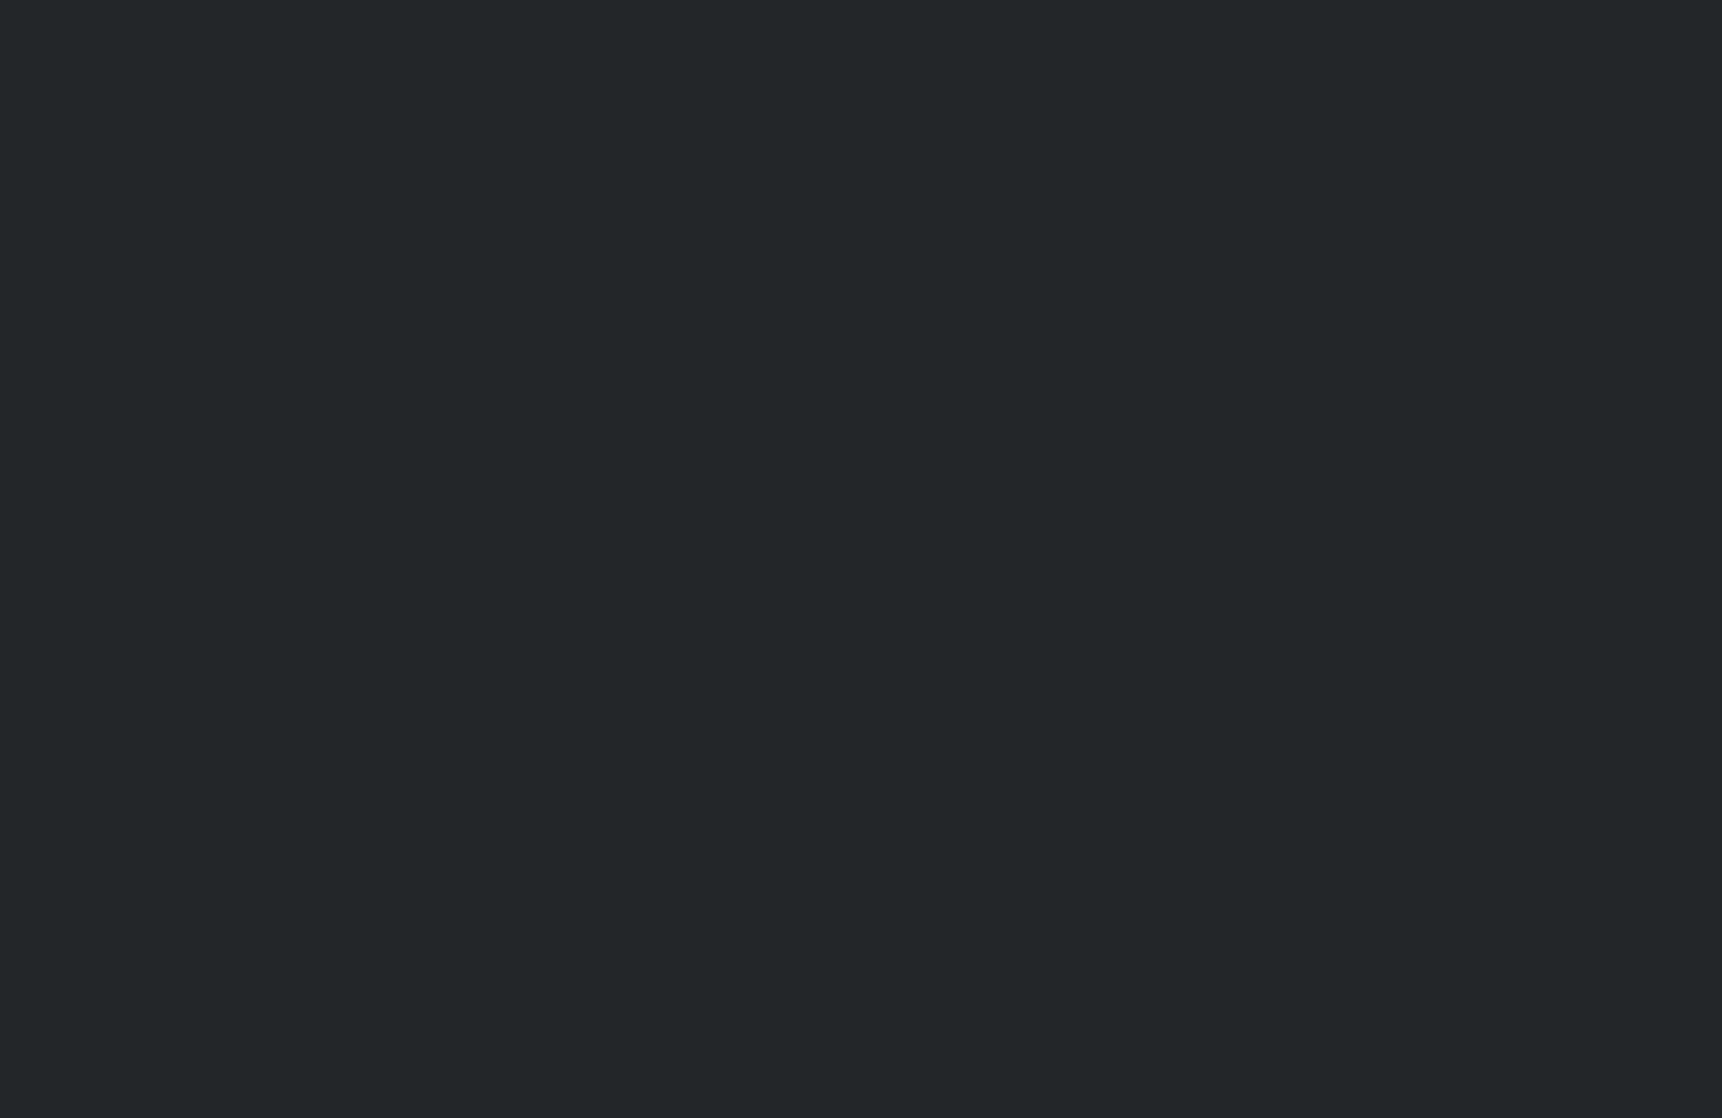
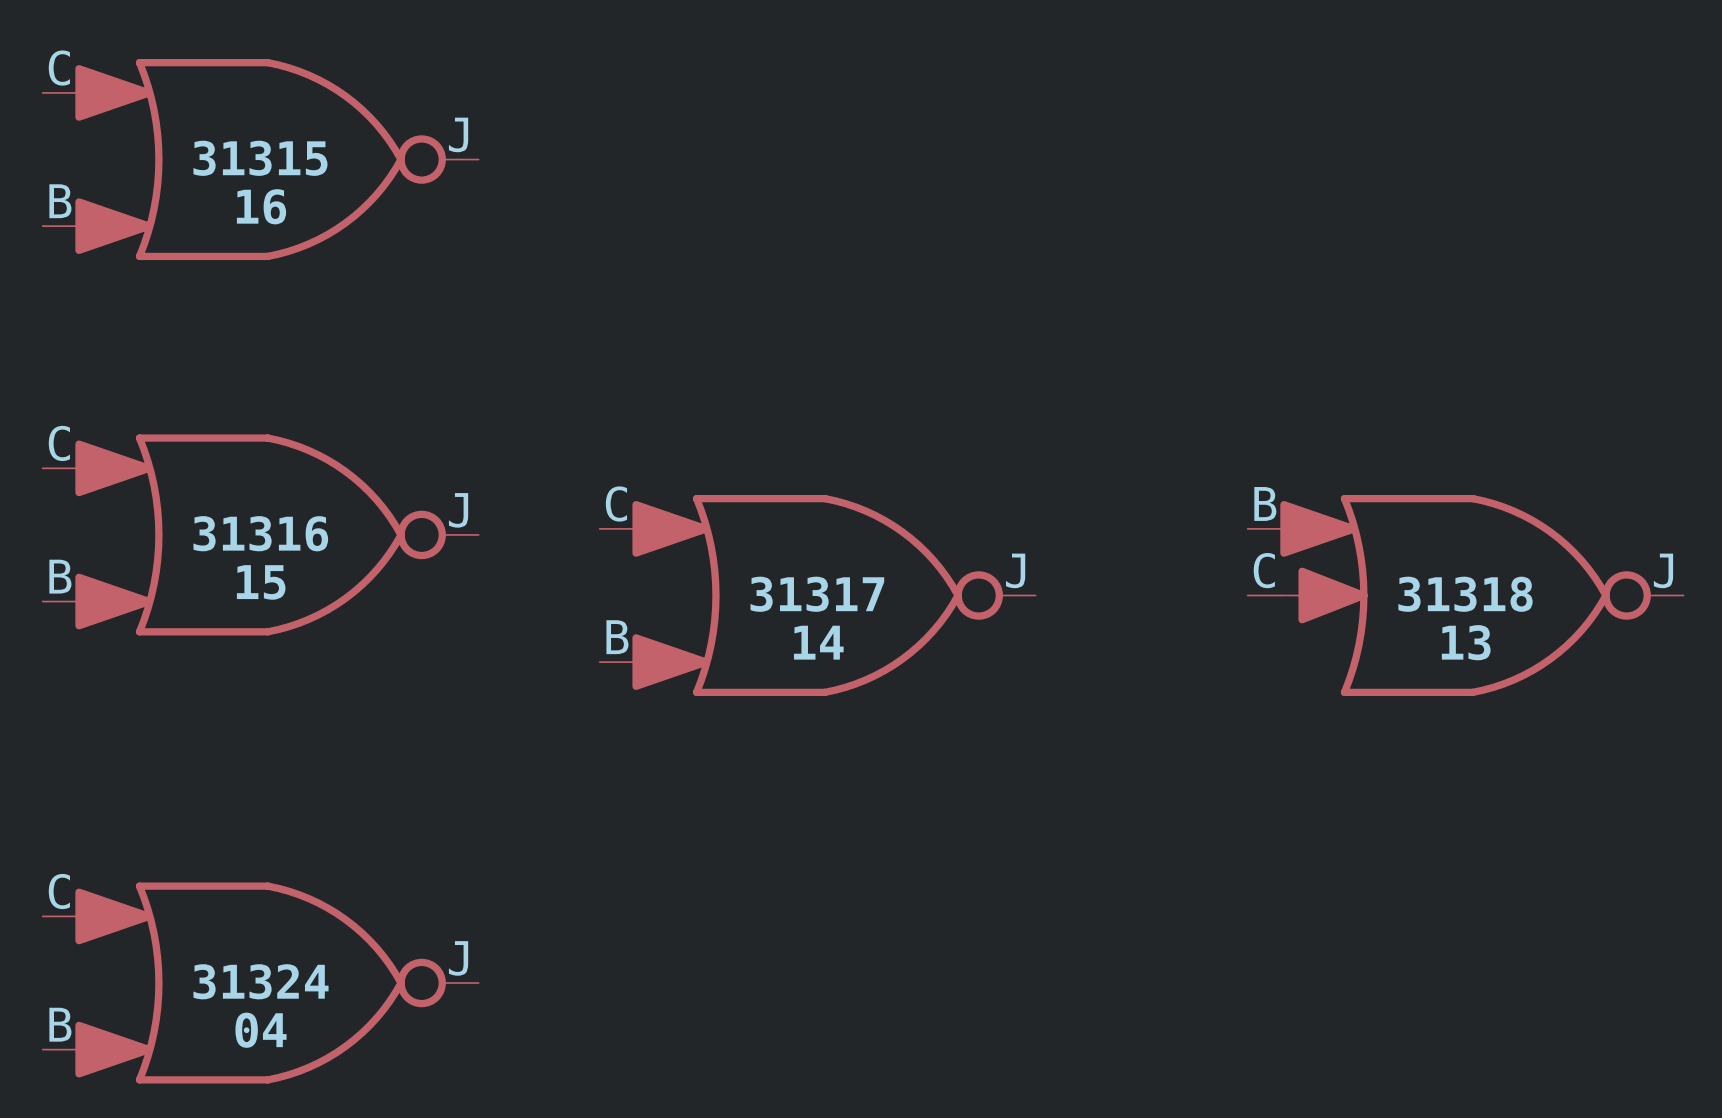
part: none -> (260, 159)
part: none -> (260, 534)
part: none -> (817, 595)
part: none -> (1465, 595)
part: none -> (260, 983)

